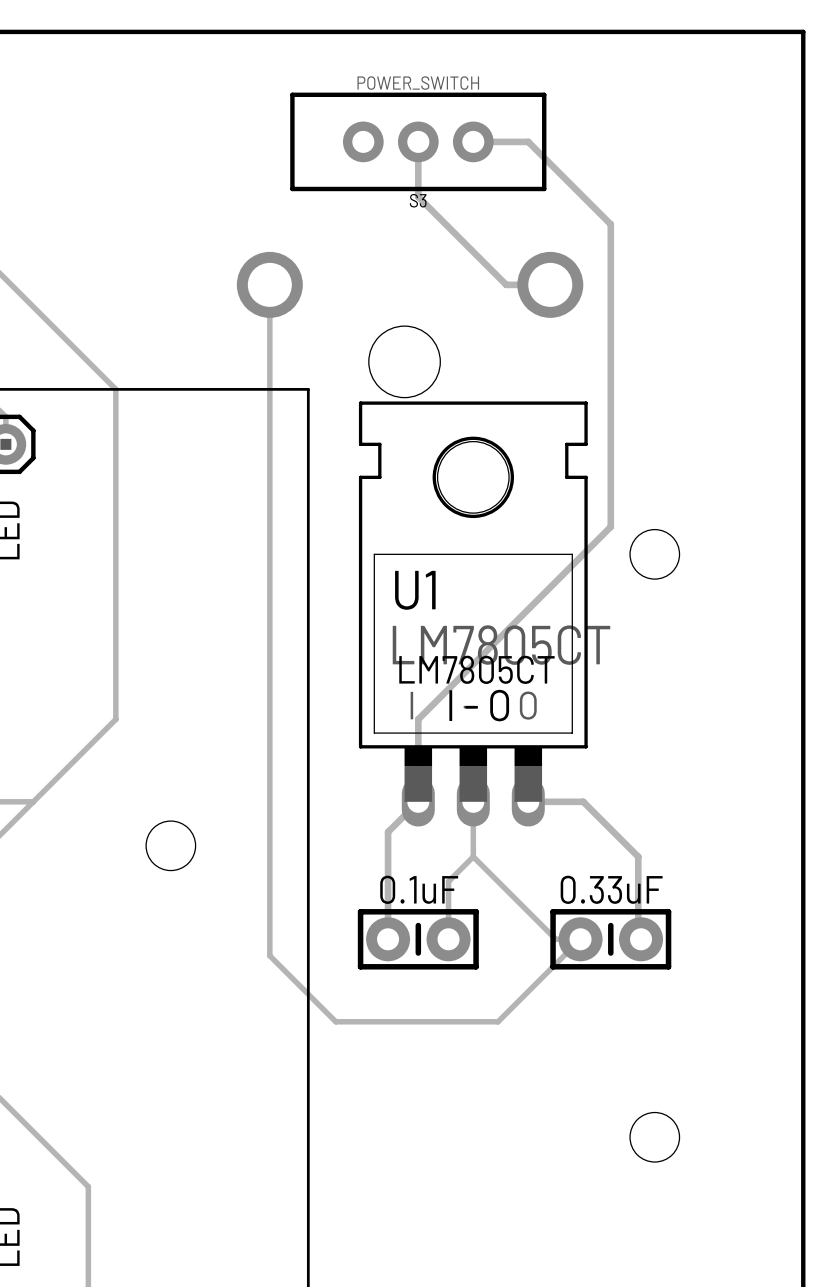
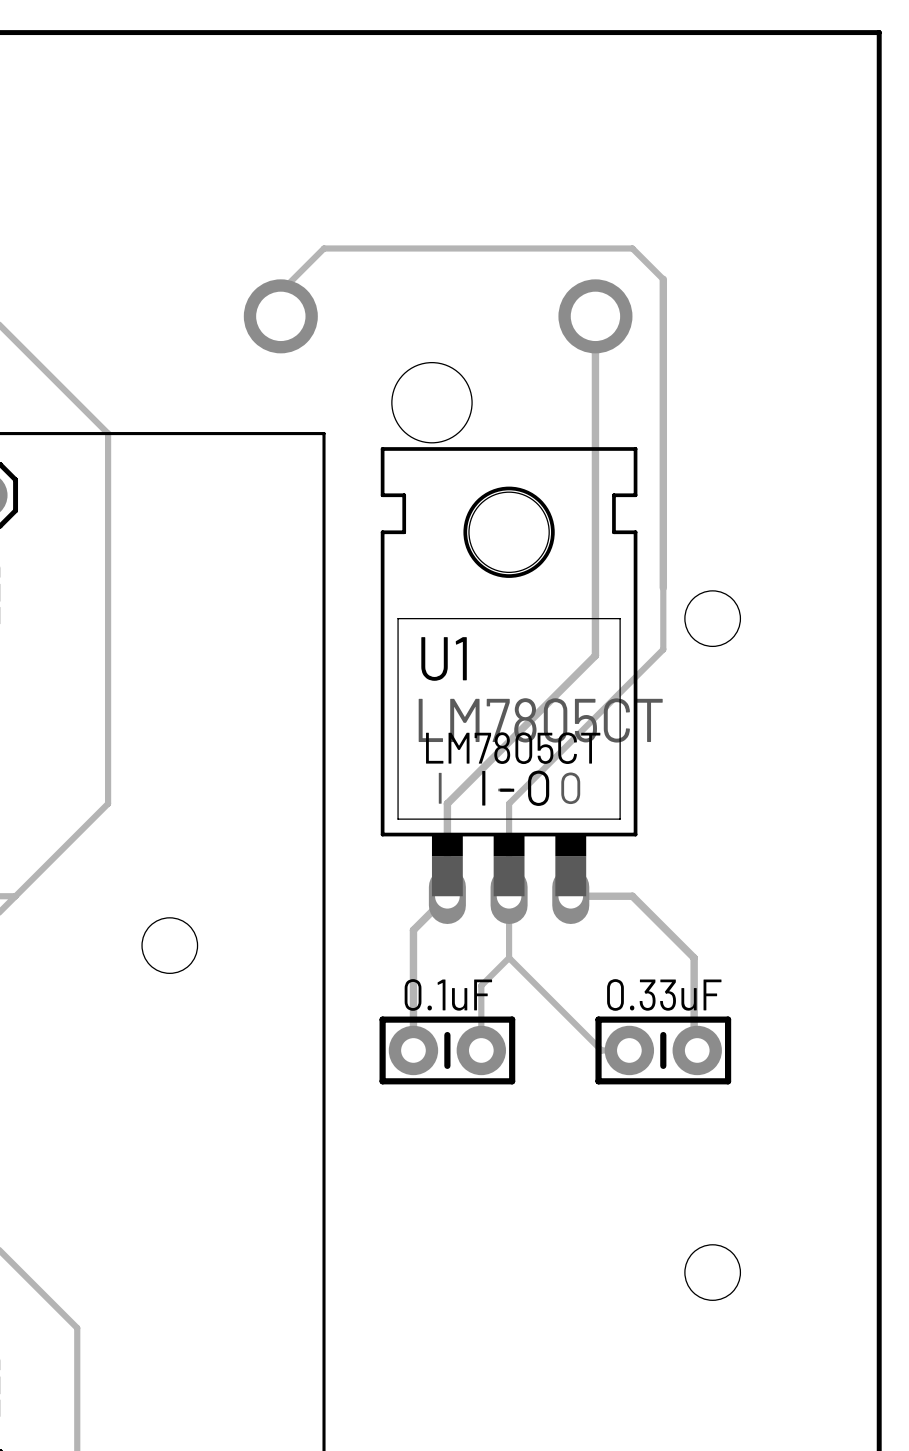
track: (418, 141) (418, 196) (506, 284) (550, 284) -> (595, 655) (595, 316)
S3: POWER_SWITCH (418, 141) -> none
track: (473, 141) (528, 141) (610, 224) (610, 251) -> (280, 316) (280, 291) (324, 248) (632, 248) (663, 279)
track: (269, 284) (269, 955) (335, 1021) (498, 1021) (580, 939) -> none
track: (610, 526) (550, 587) -> (663, 587) (663, 649) (509, 803) (509, 896)

